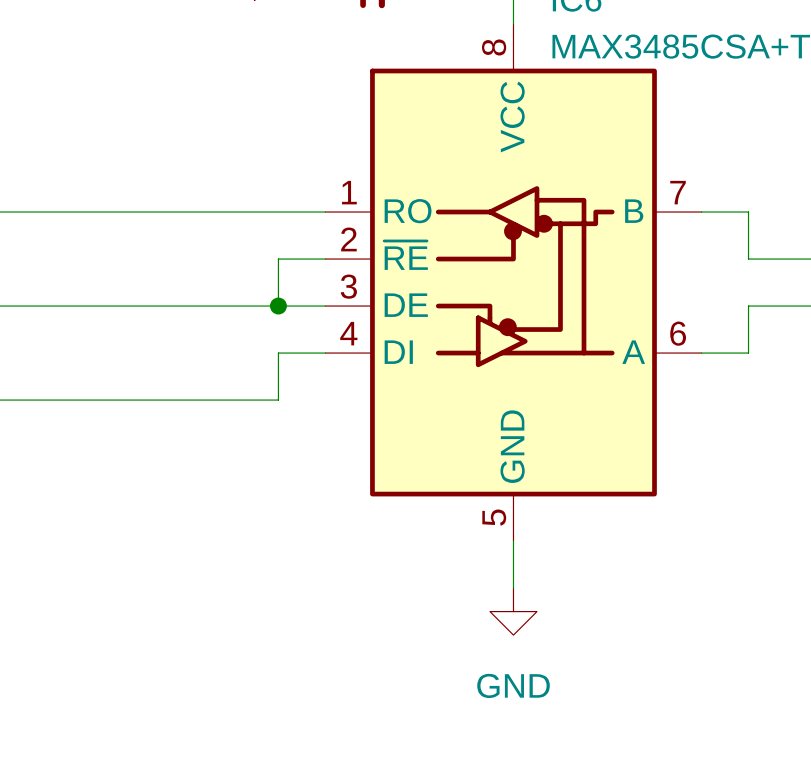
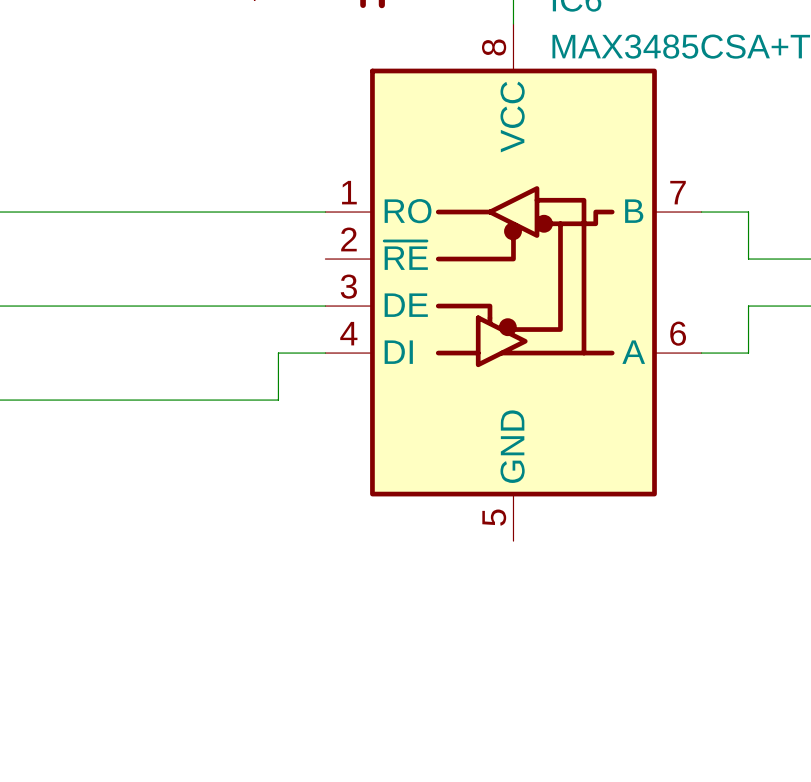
wire: (325, 259) (278, 259) (278, 306) -> none
junction: (278, 306) -> none
wire: (513, 541) (513, 588) -> none
power symbol: GND (513, 611) -> none

